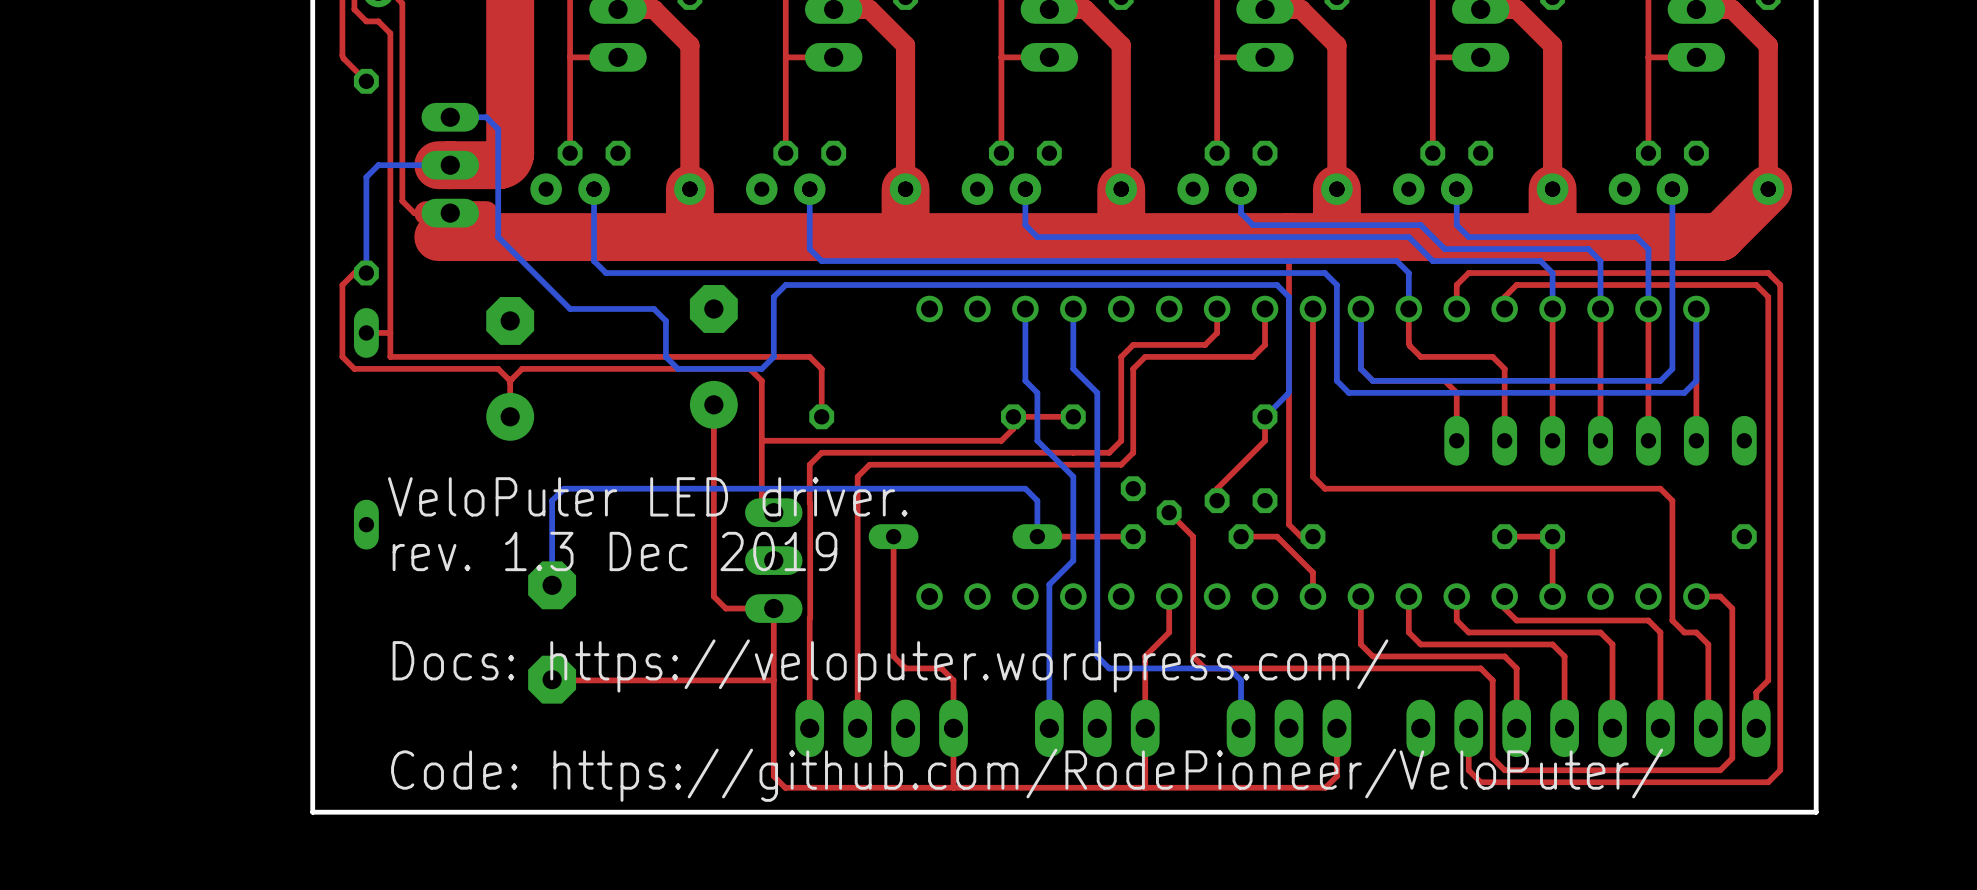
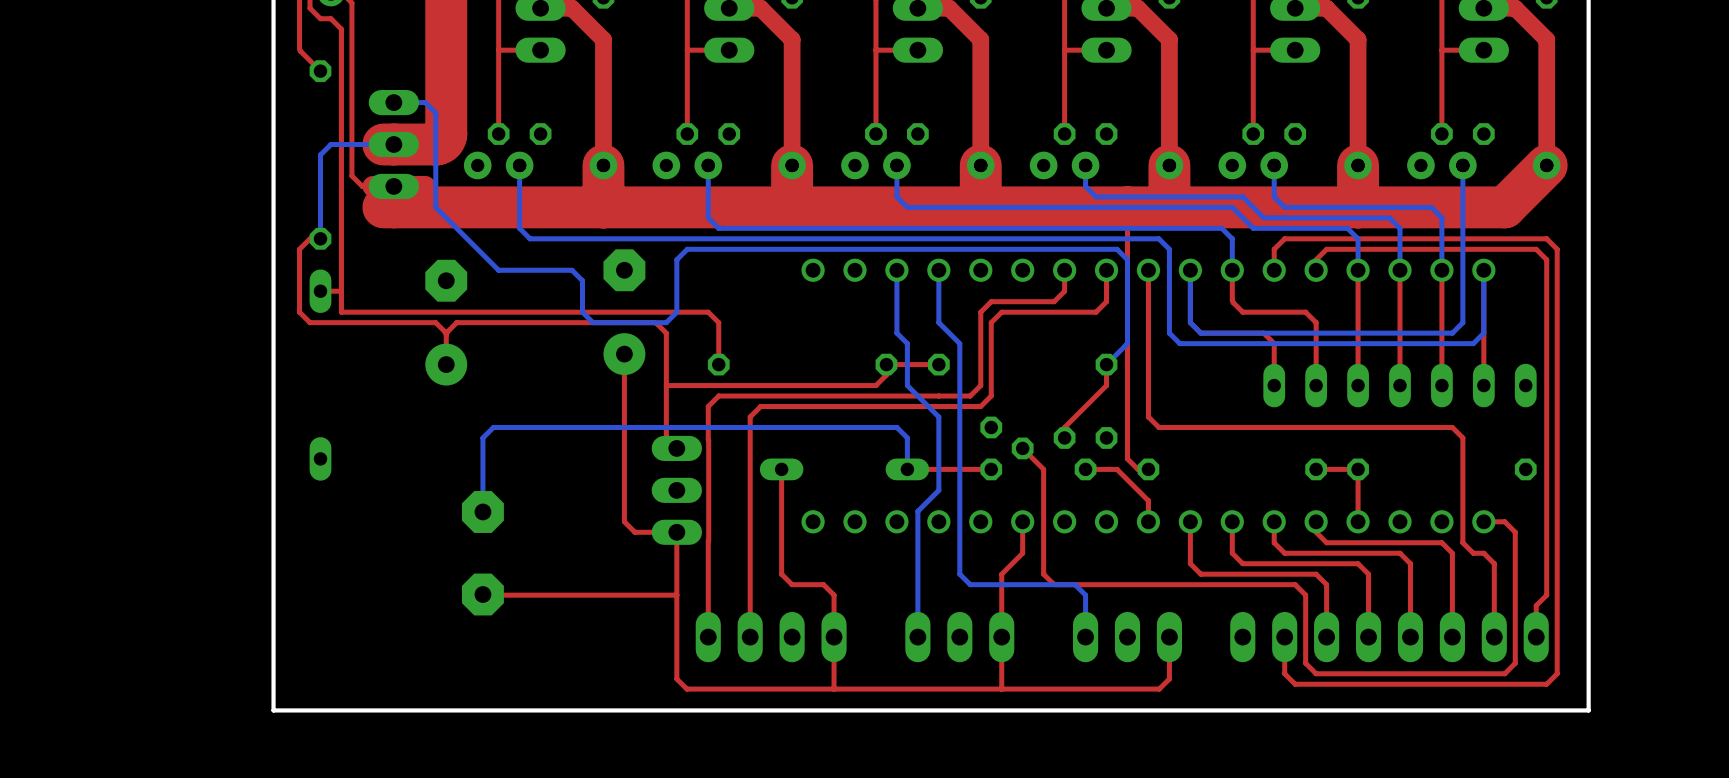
text: VeloPuter LED driver. (647, 496) -> none
text: rev. 1.3 Dec 2019 (614, 551) -> none
text: Docs: https://veloputer.wordpress.com/ (890, 665) -> none
text: Code: https://github.com/RodePioneer/VeloPuter/ (1027, 775) -> none

